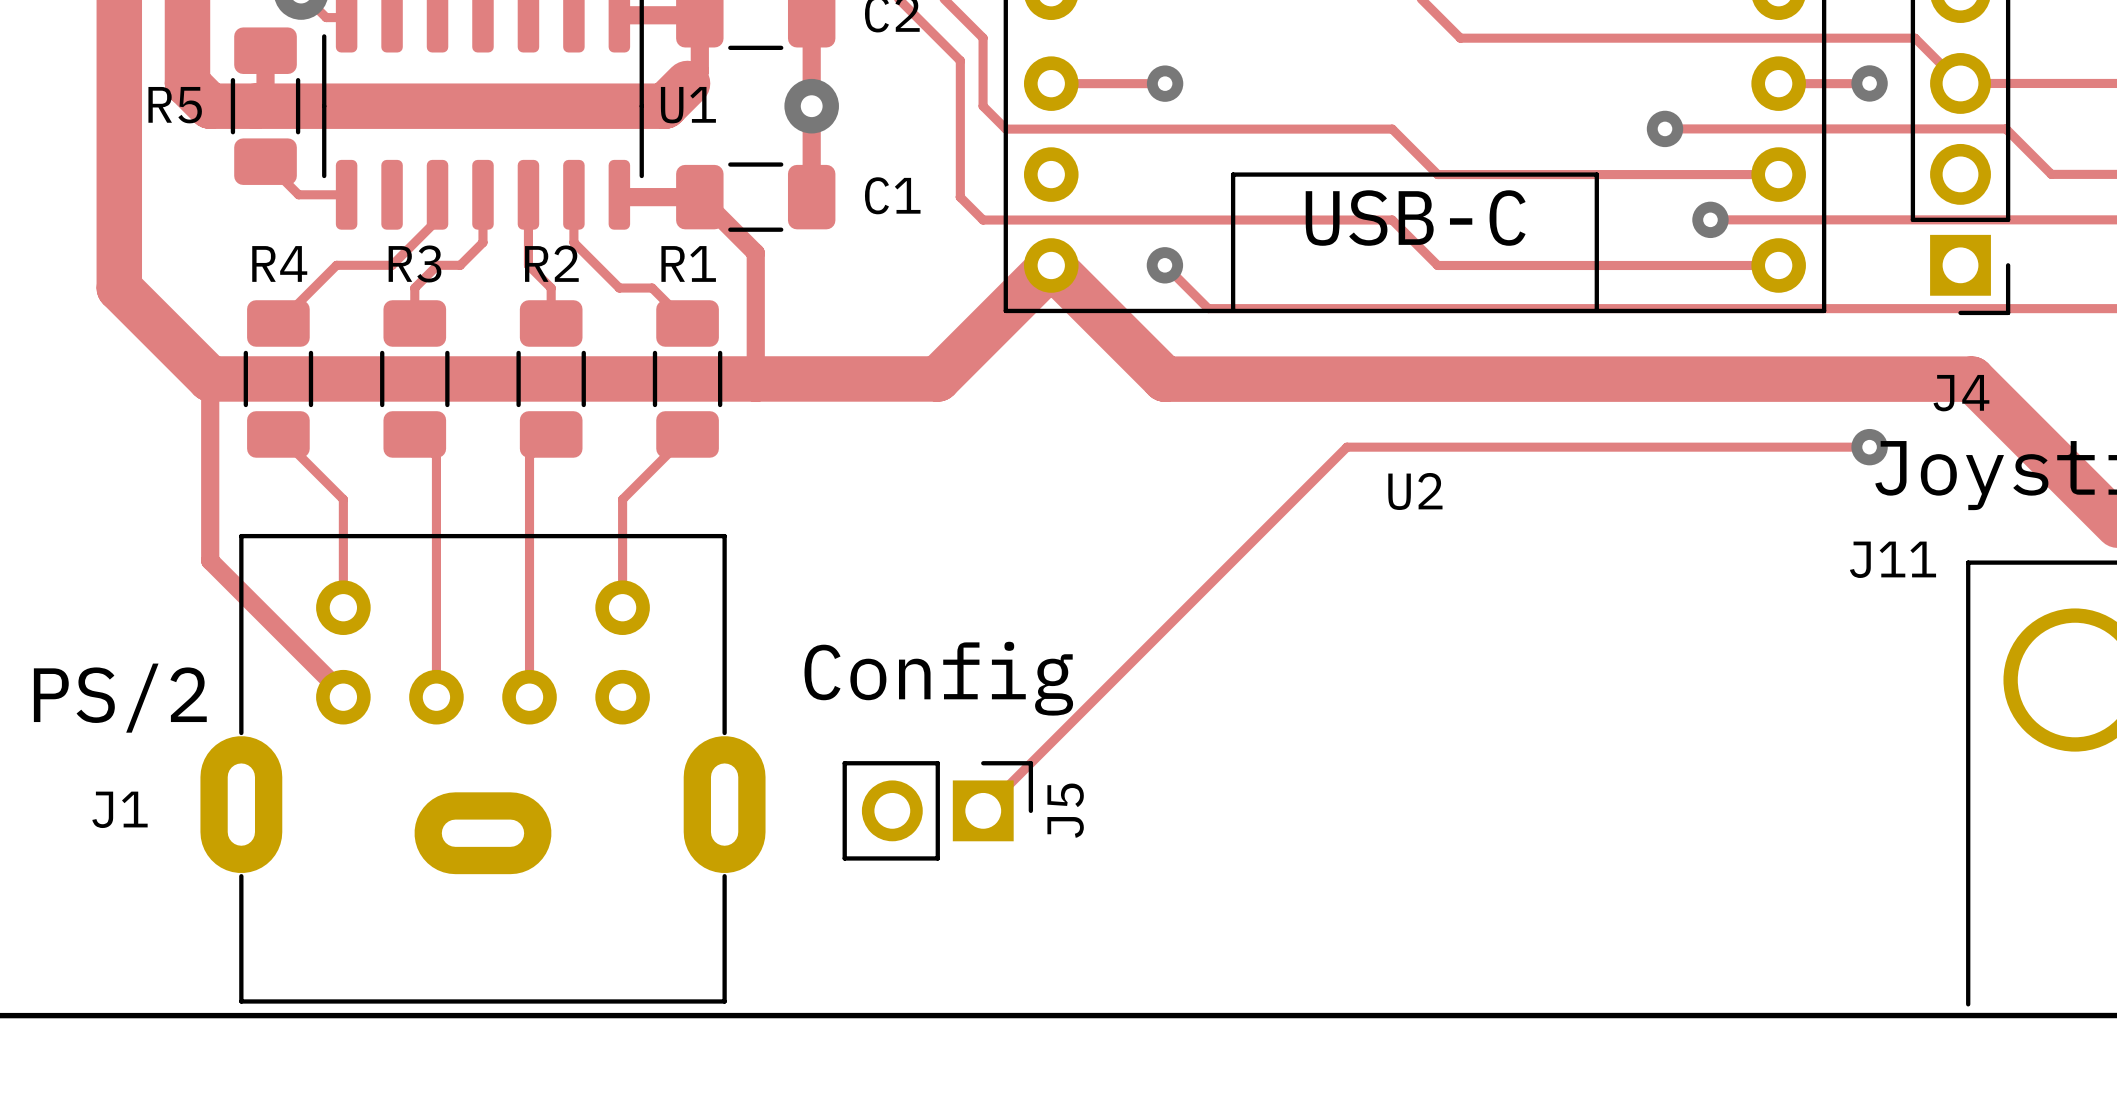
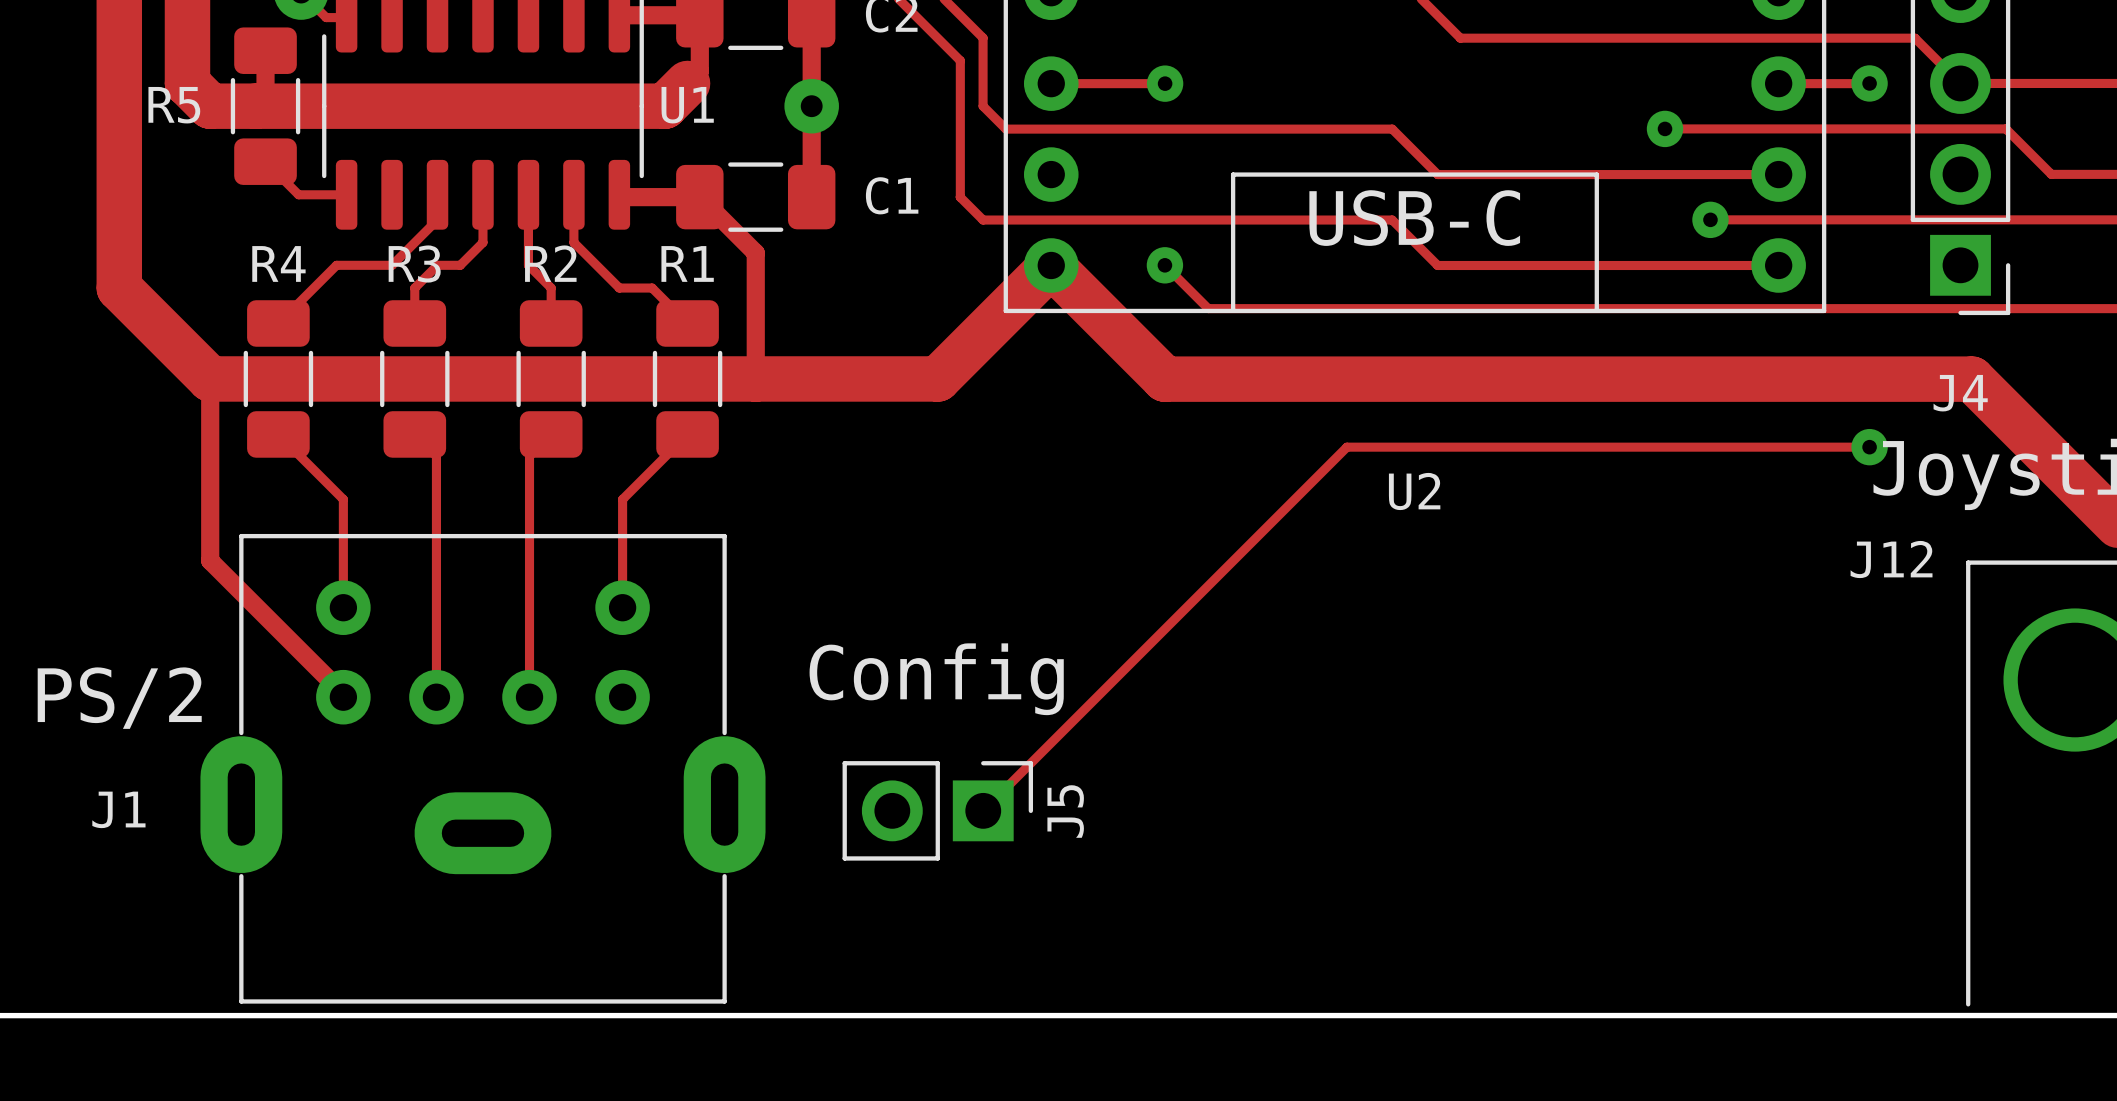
J11 name: J11 (1893, 559) -> J12 (1891, 559)

